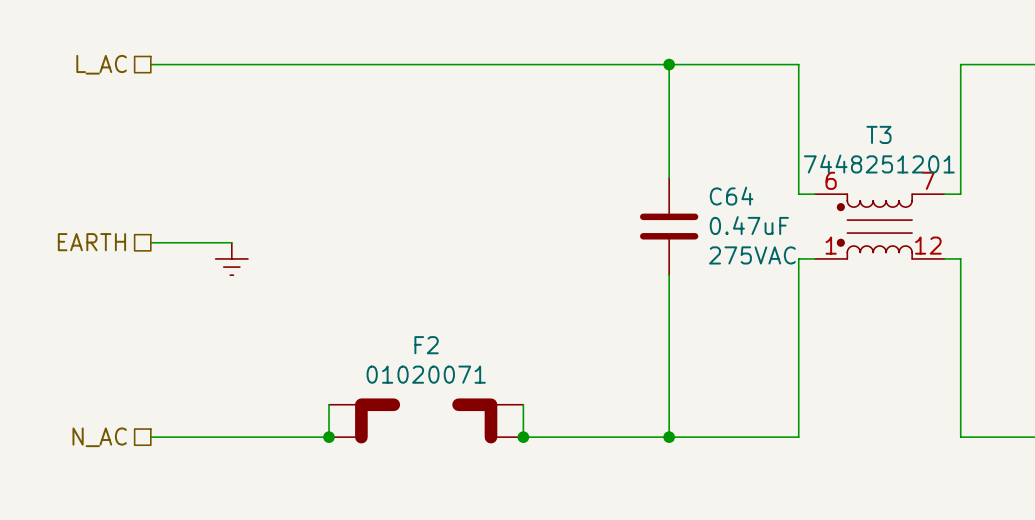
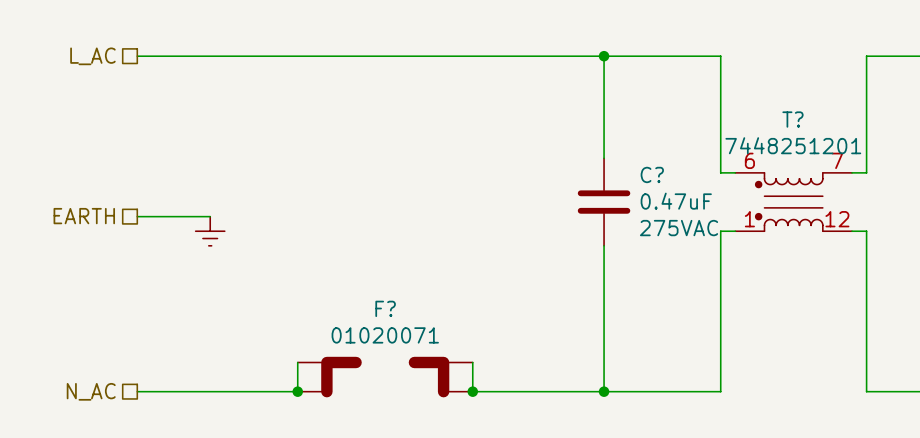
T3 name: T3 (878, 134) -> T? (792, 119)
C64 name: C64 (731, 196) -> C? (652, 174)
F2 name: F2 (426, 345) -> F? (385, 308)

